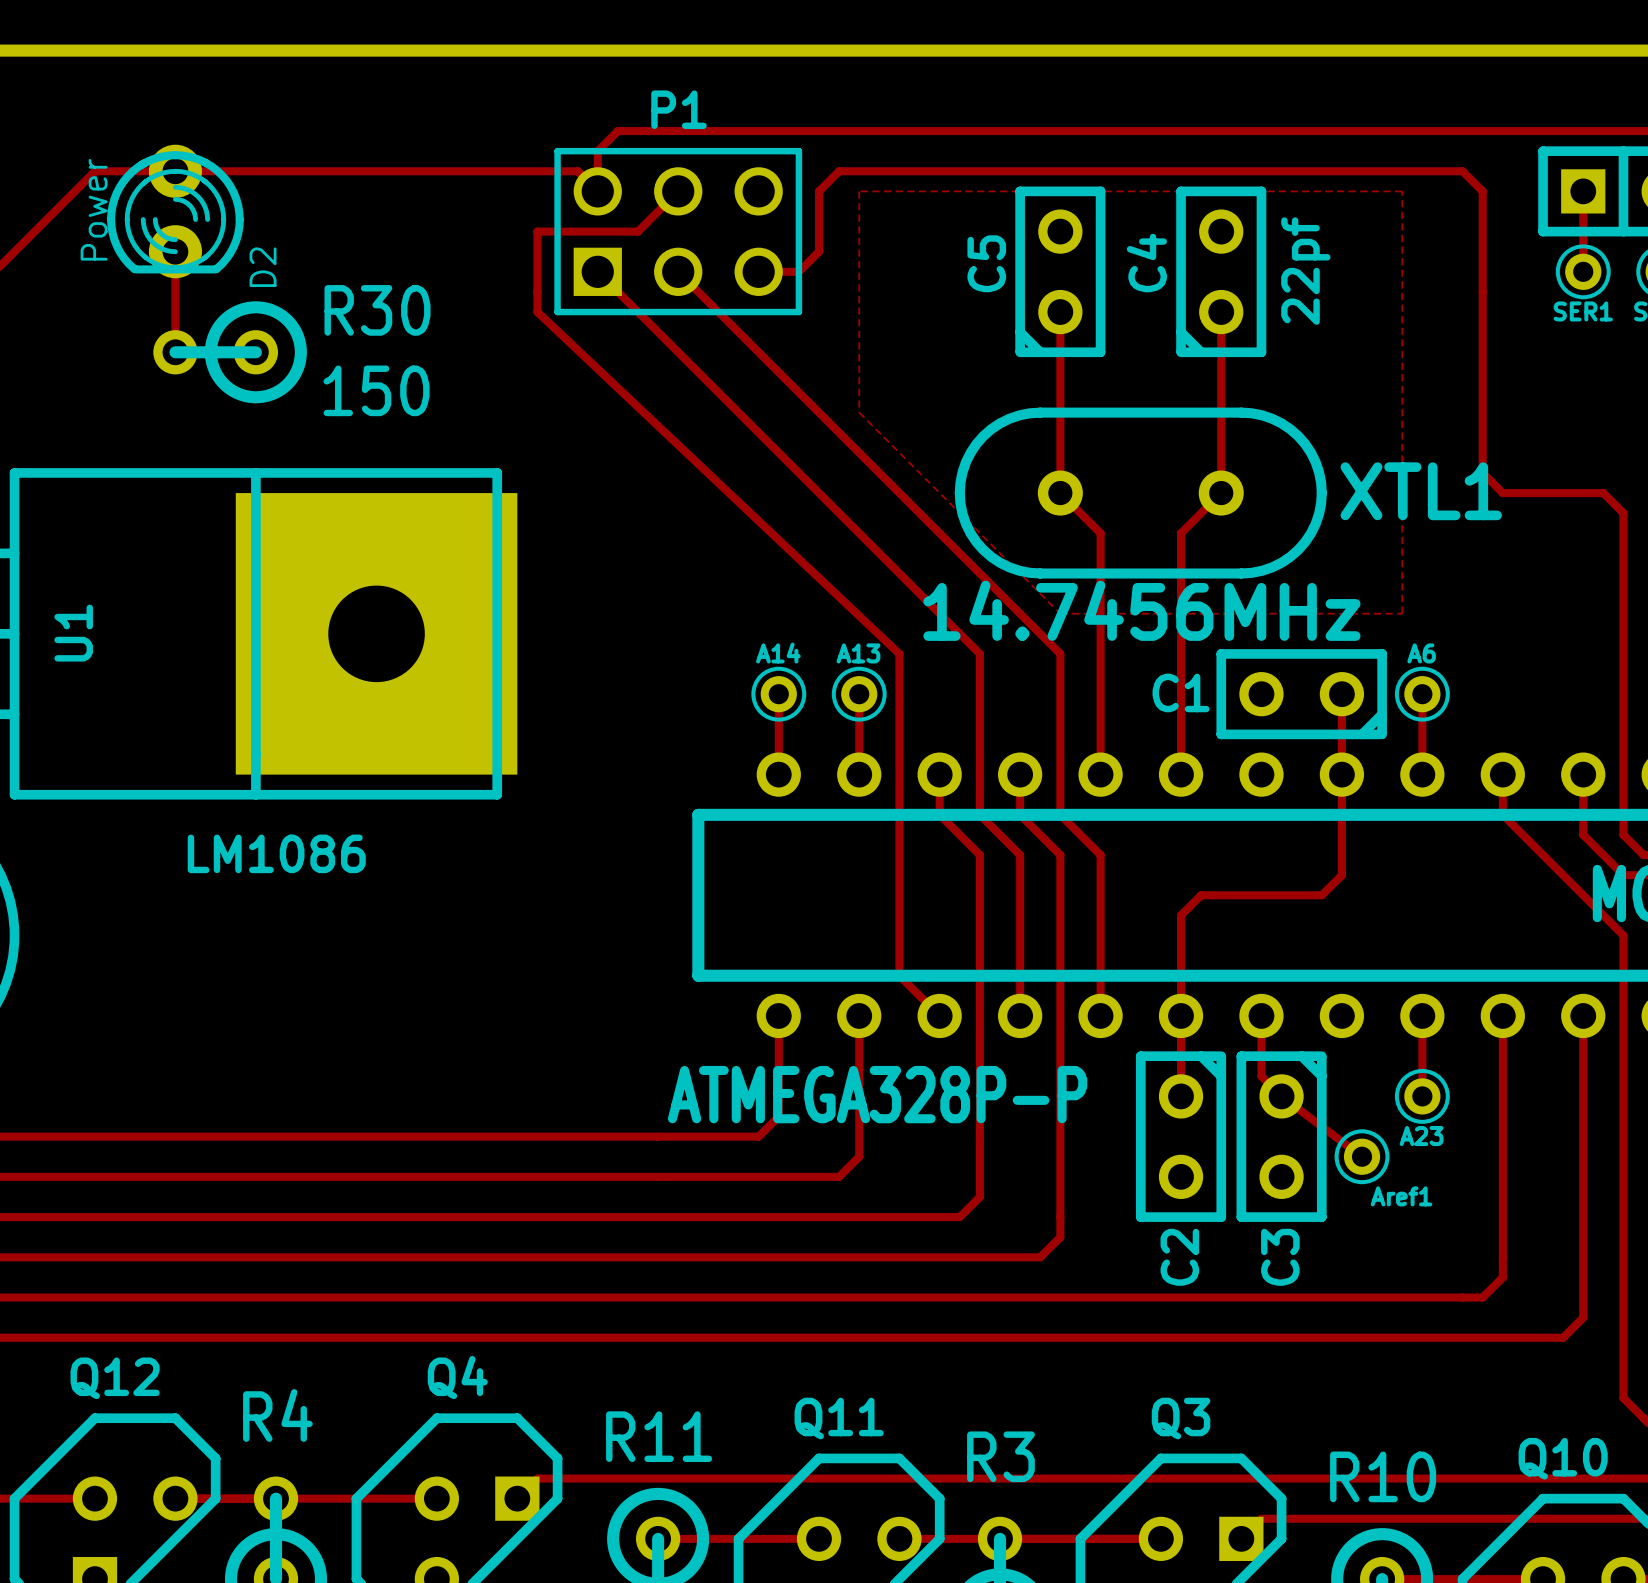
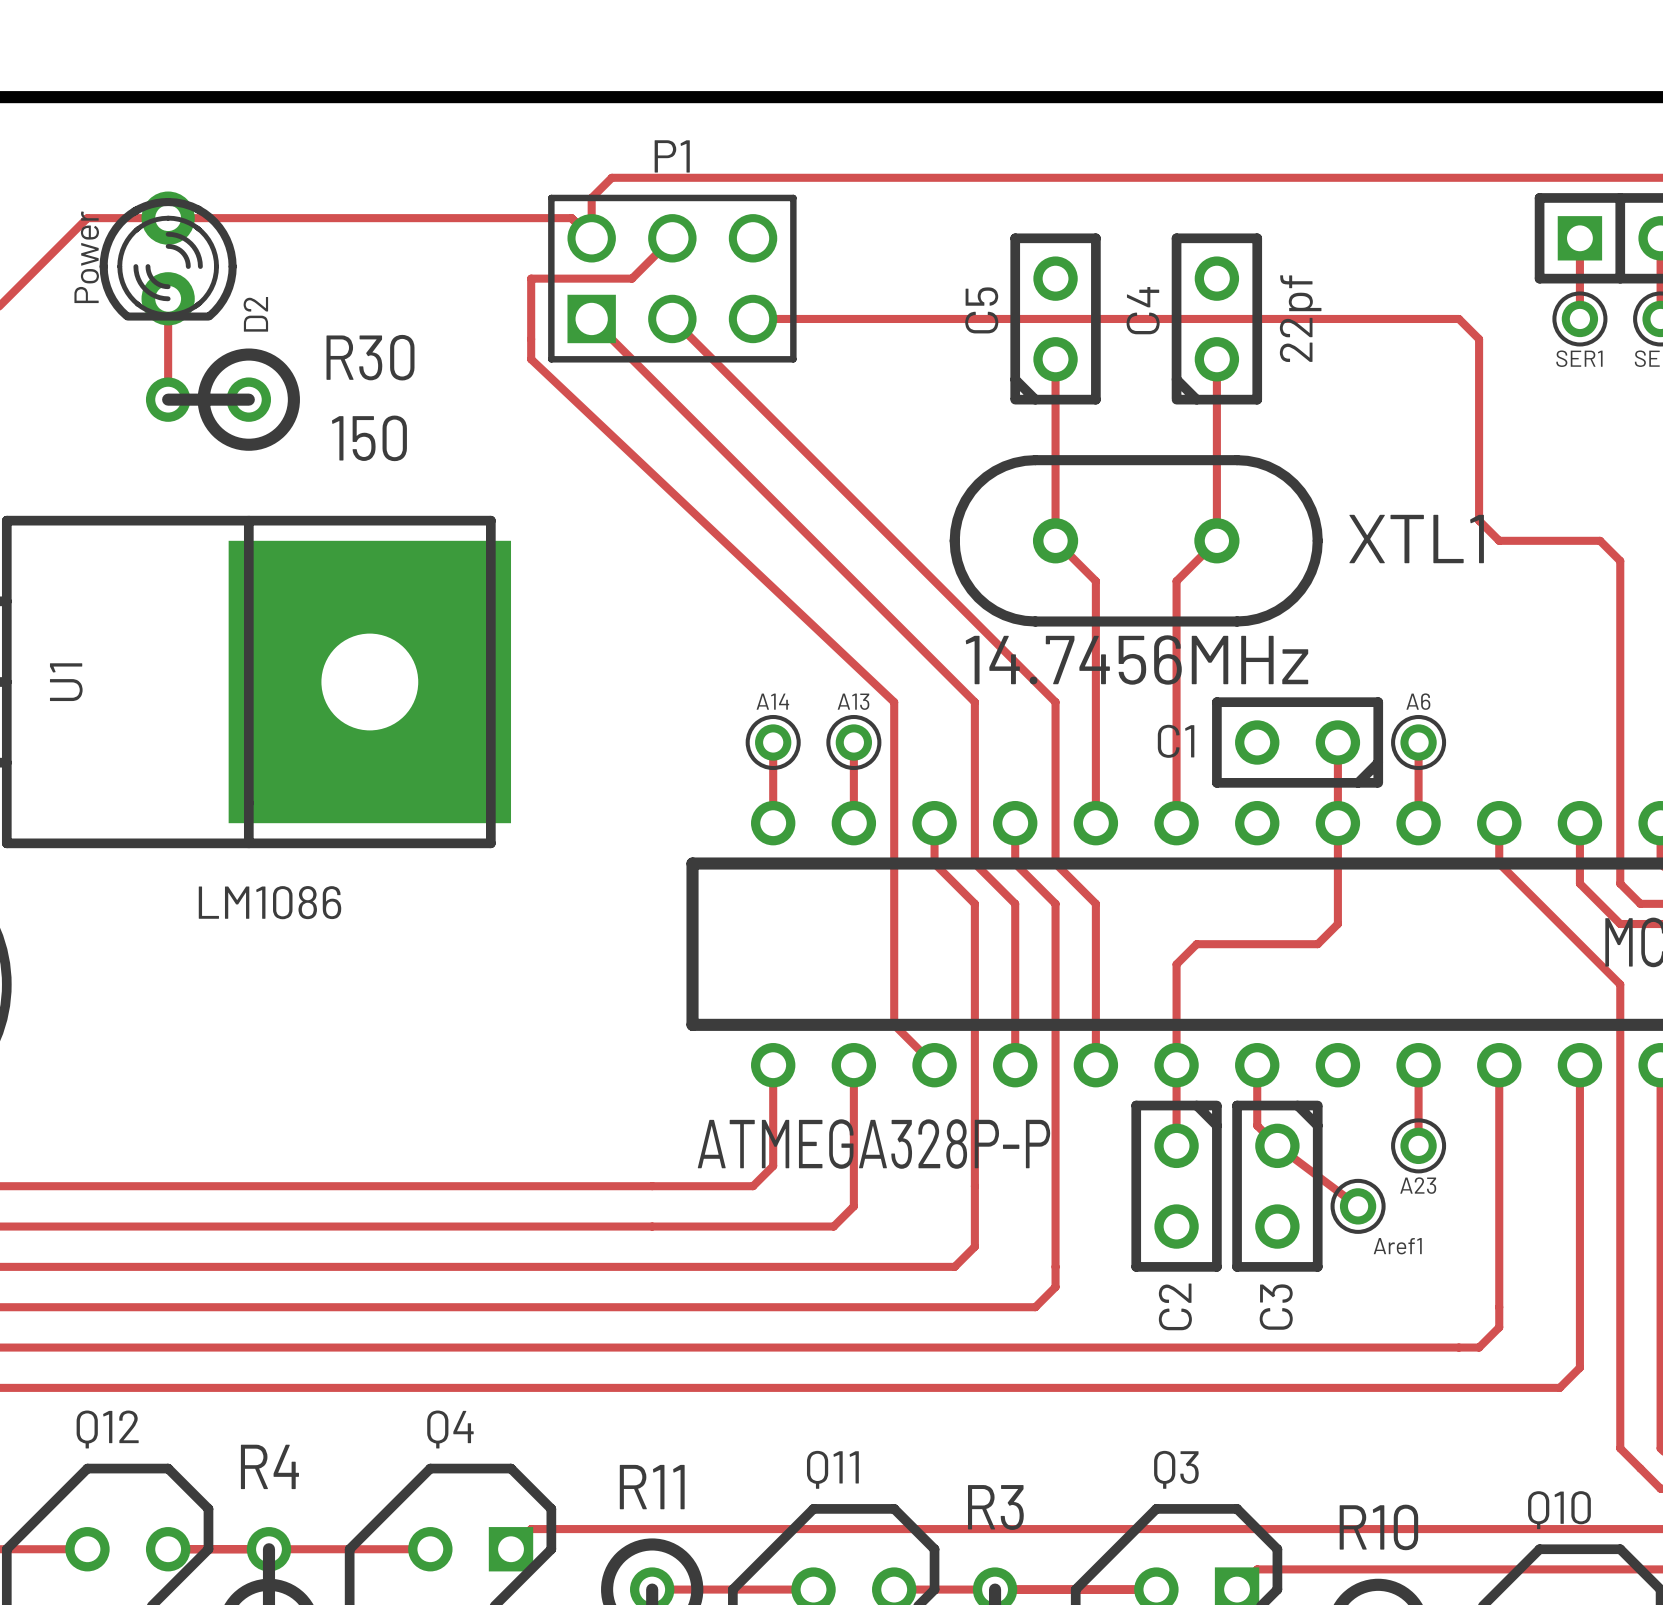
zone outline: (859, 191) (1402, 191) (1402, 613) (1060, 613) (859, 412) (859, 191) -> none
track: (798, 271) (819, 251) (819, 191) (839, 171) (1462, 171) (1482, 191) (1482, 291) -> (793, 318) (1458, 318) (1479, 339)

